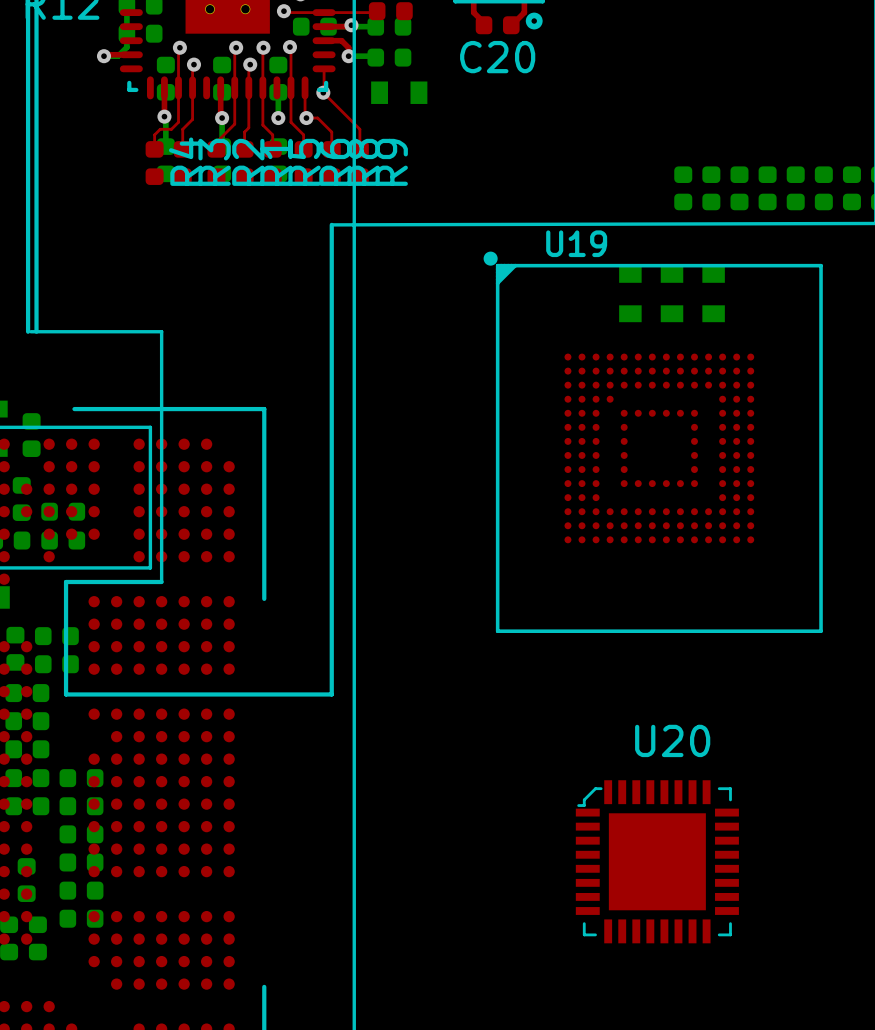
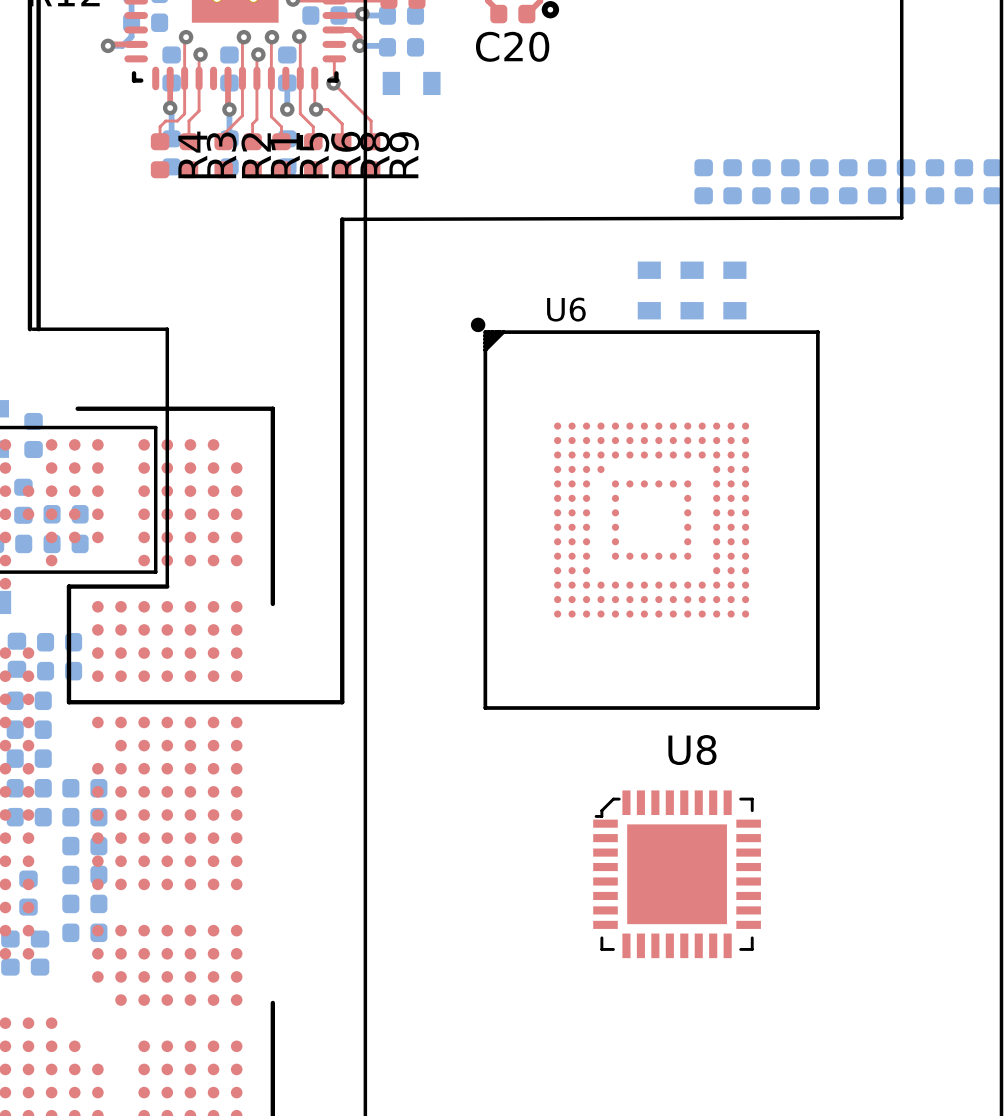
U19: (653, 442) -> none
U6: none -> (645, 513)
U20 name: U20 (672, 740) -> U8 (692, 750)

